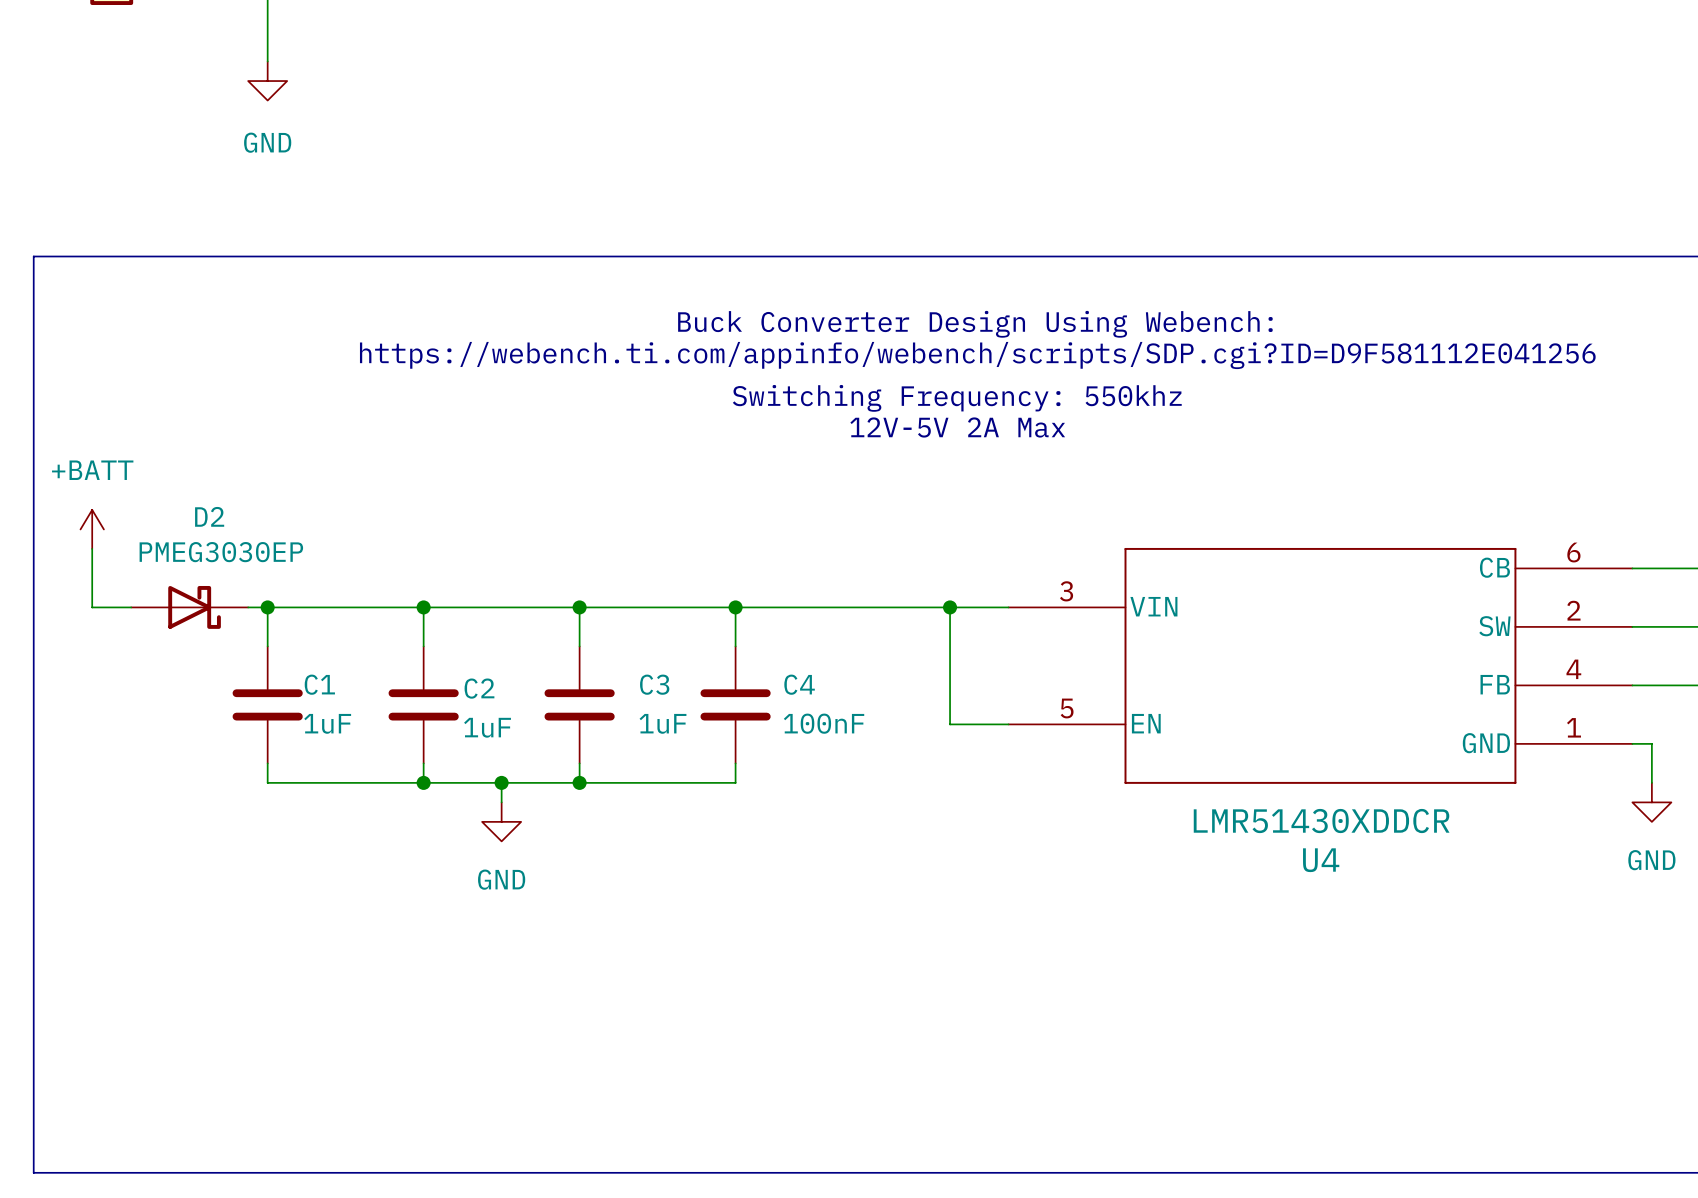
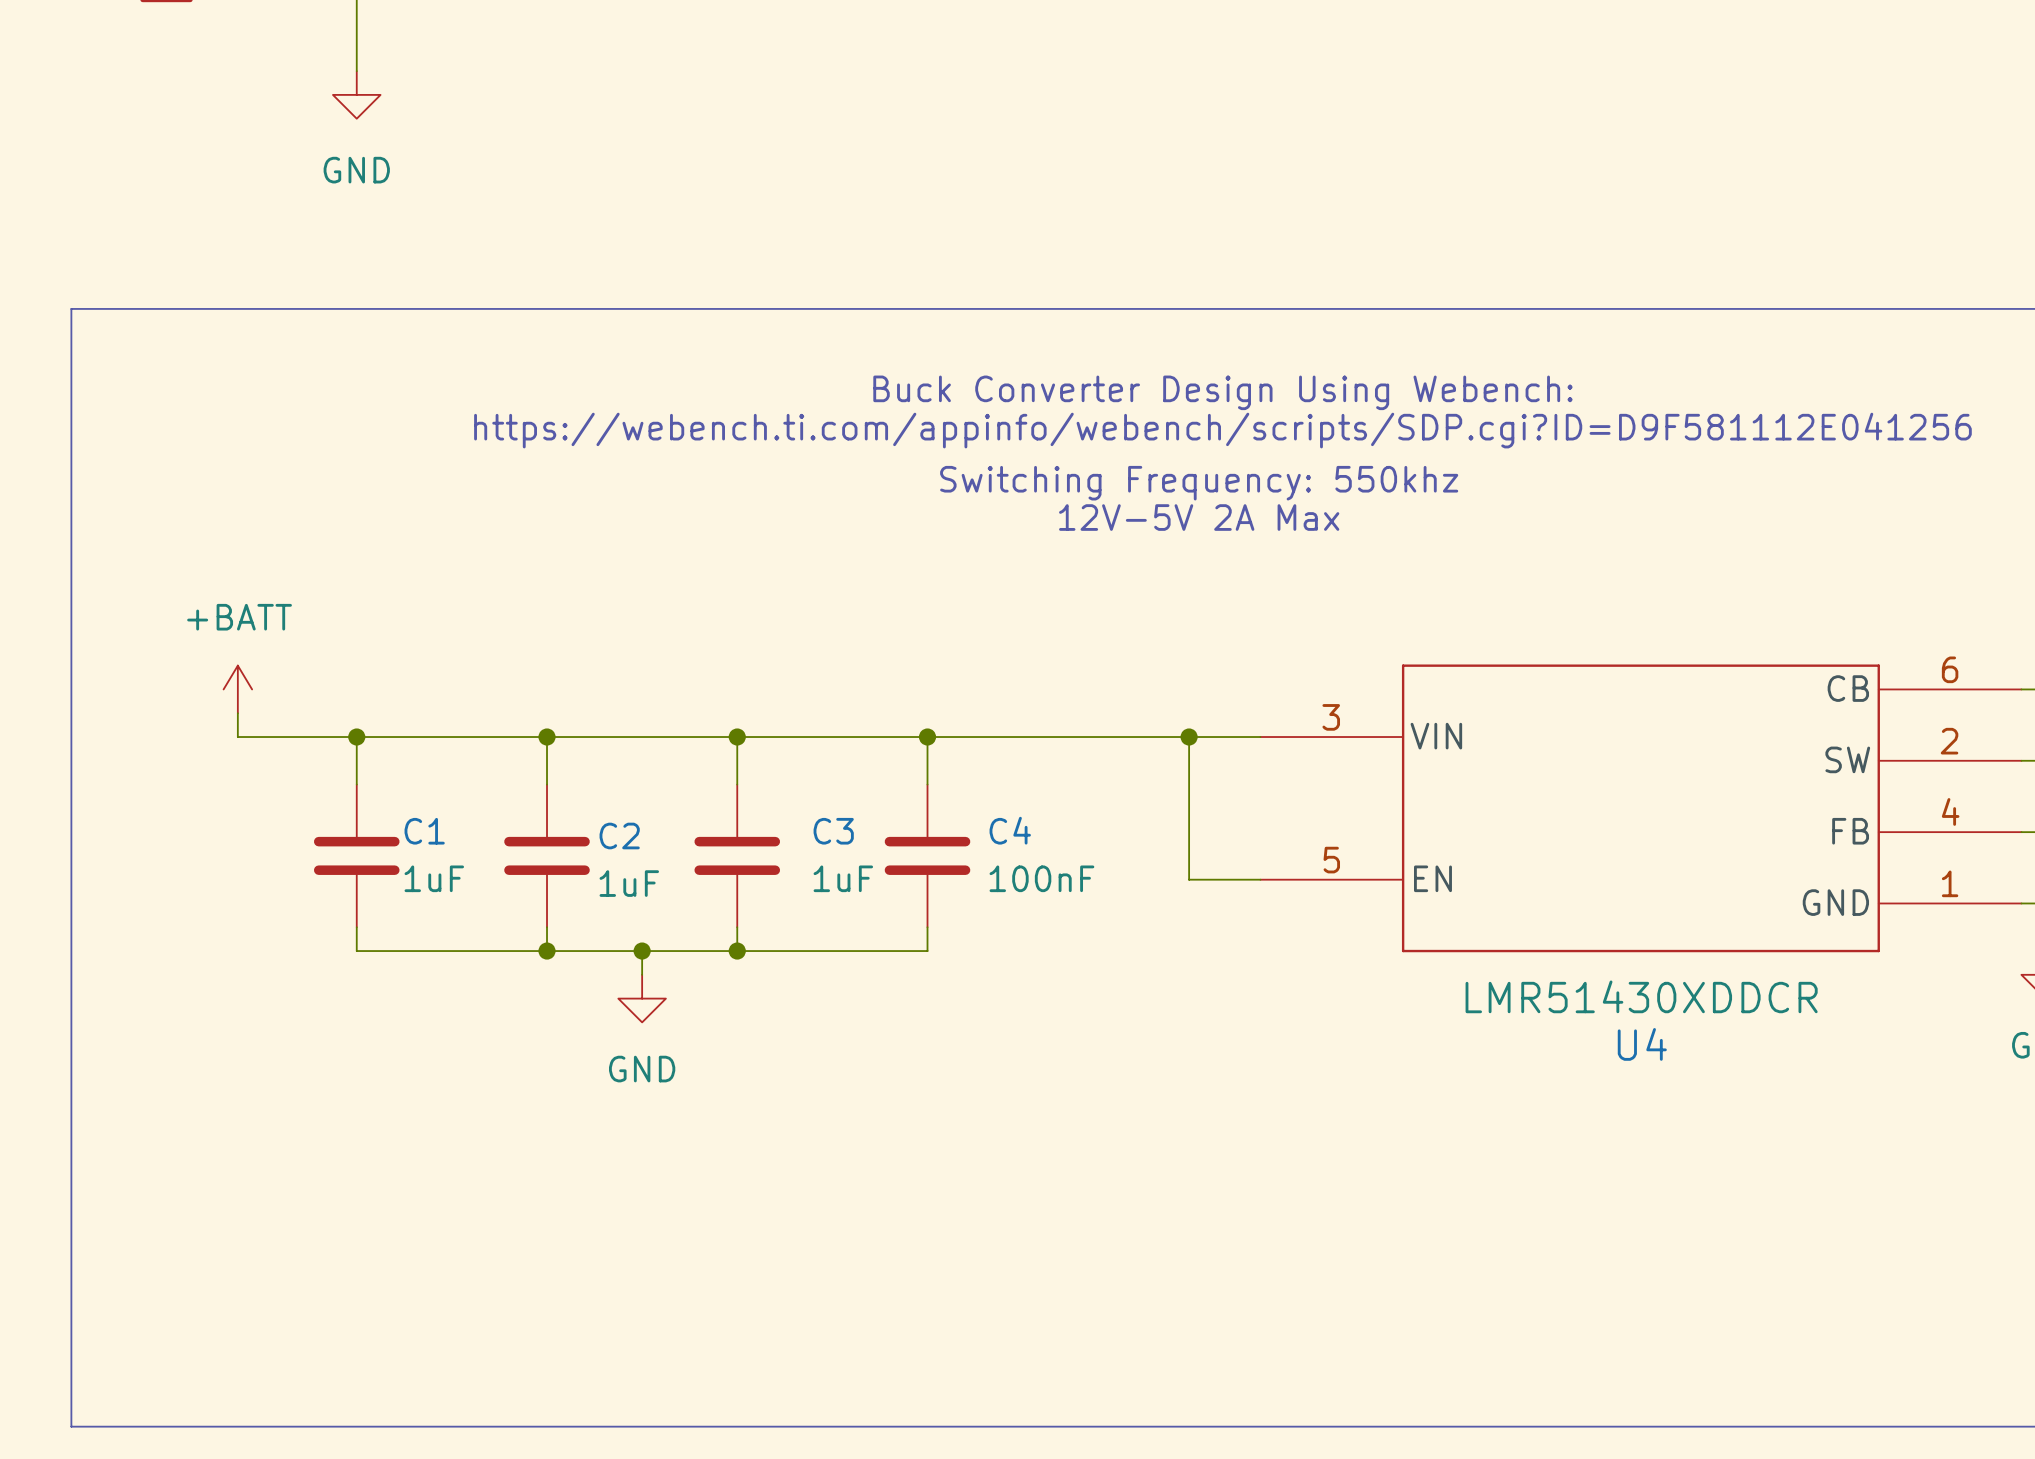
power symbol position: +BATT (92, 529) -> +BATT (237, 689)
wire: (92, 548) (92, 607) (131, 607) -> none
D2: PMEG3030EP (189, 607) -> none

